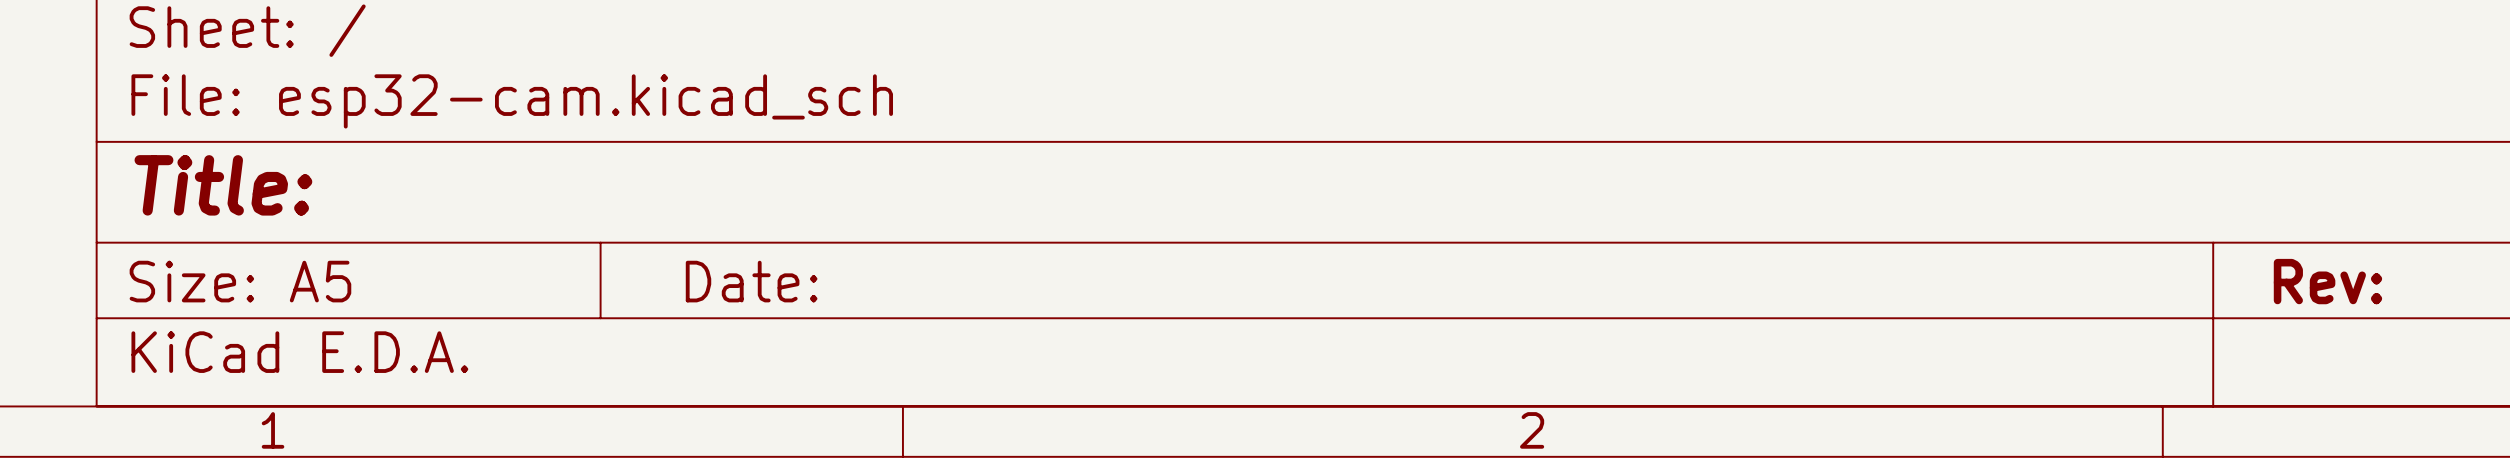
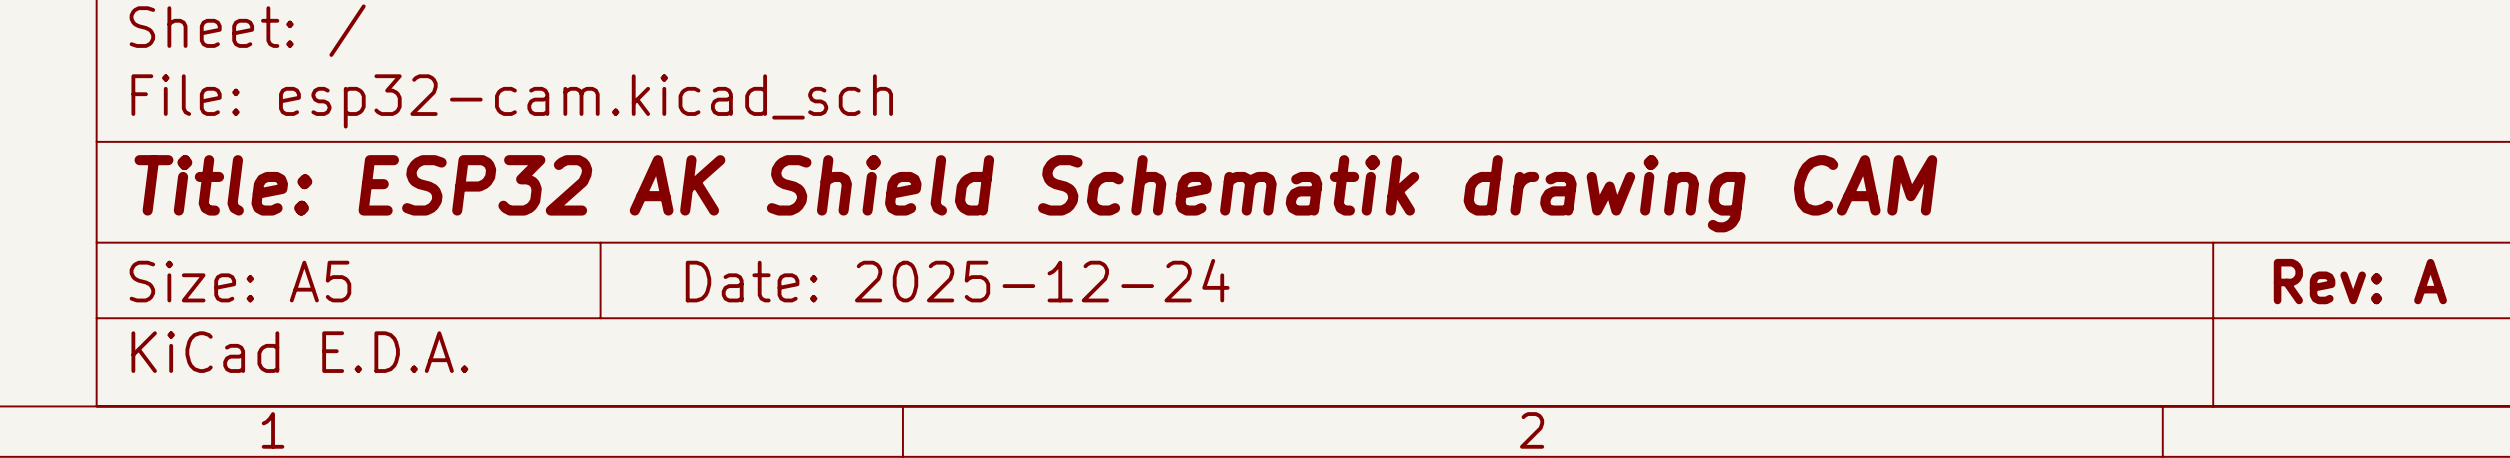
title block: Title: (223, 185) -> Title: ESP32 AK Shield Schematik drawing CAM (1035, 193)
title block: Date: (751, 281) -> Date: 2025-12-24 (957, 280)
title block: Rev: (2327, 281) -> Rev: A (2360, 281)

